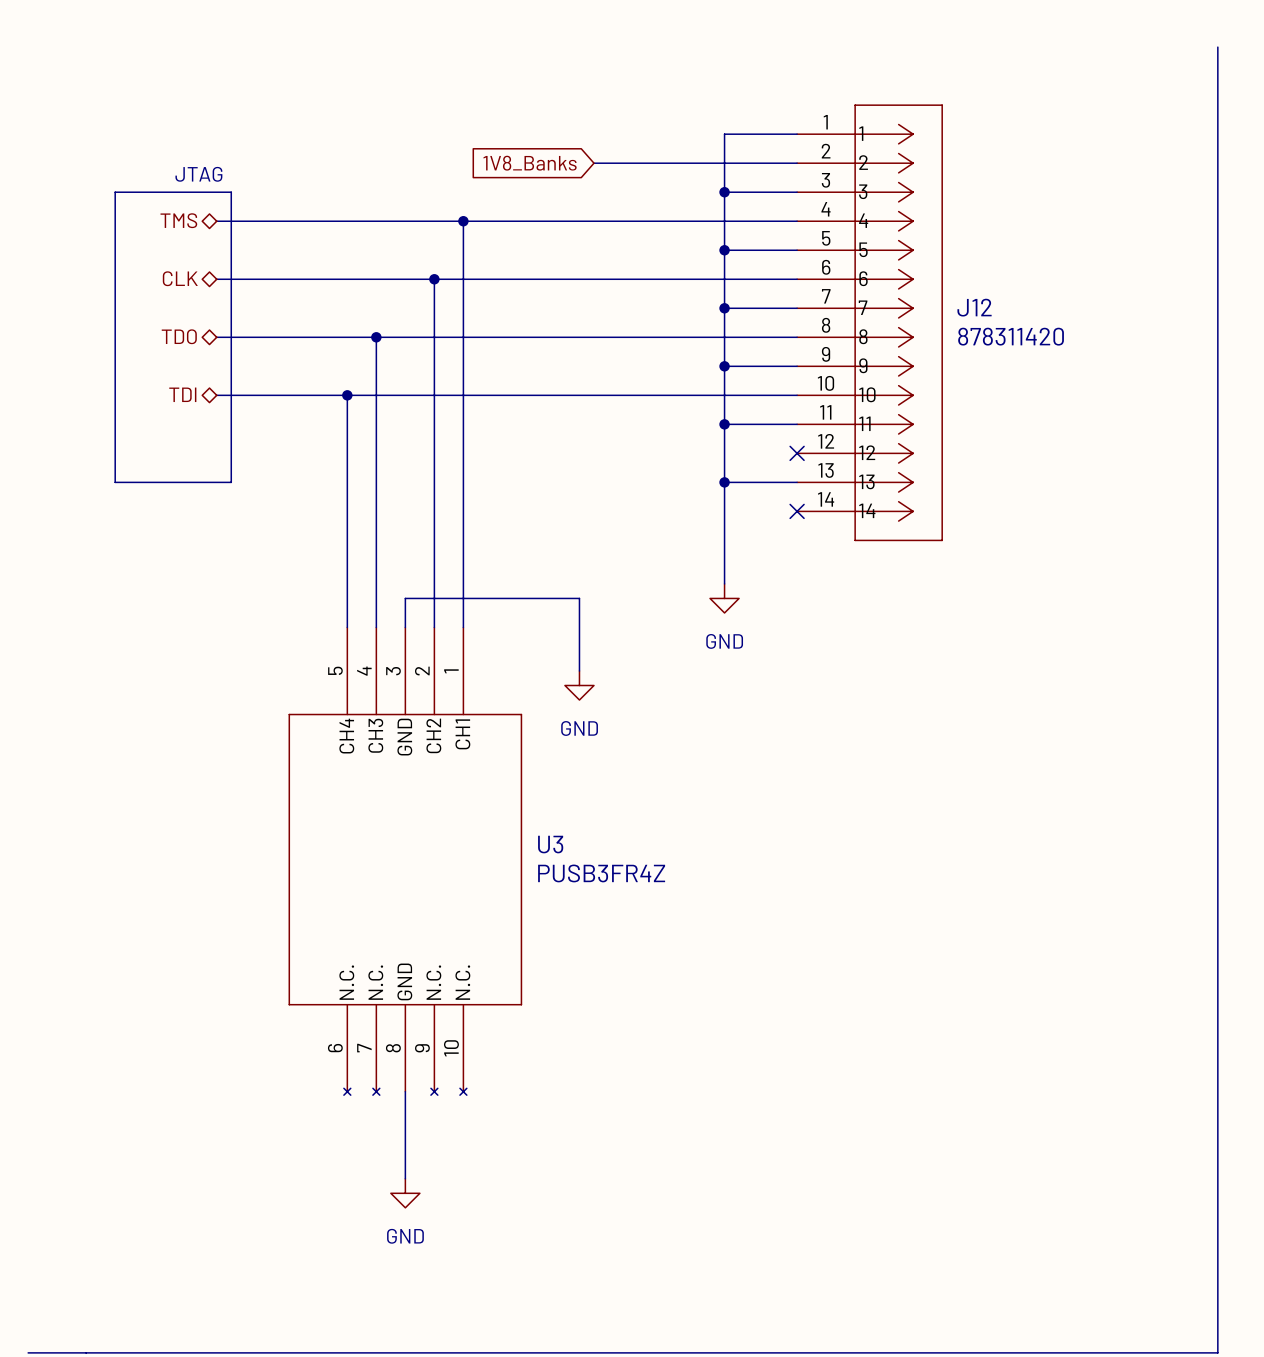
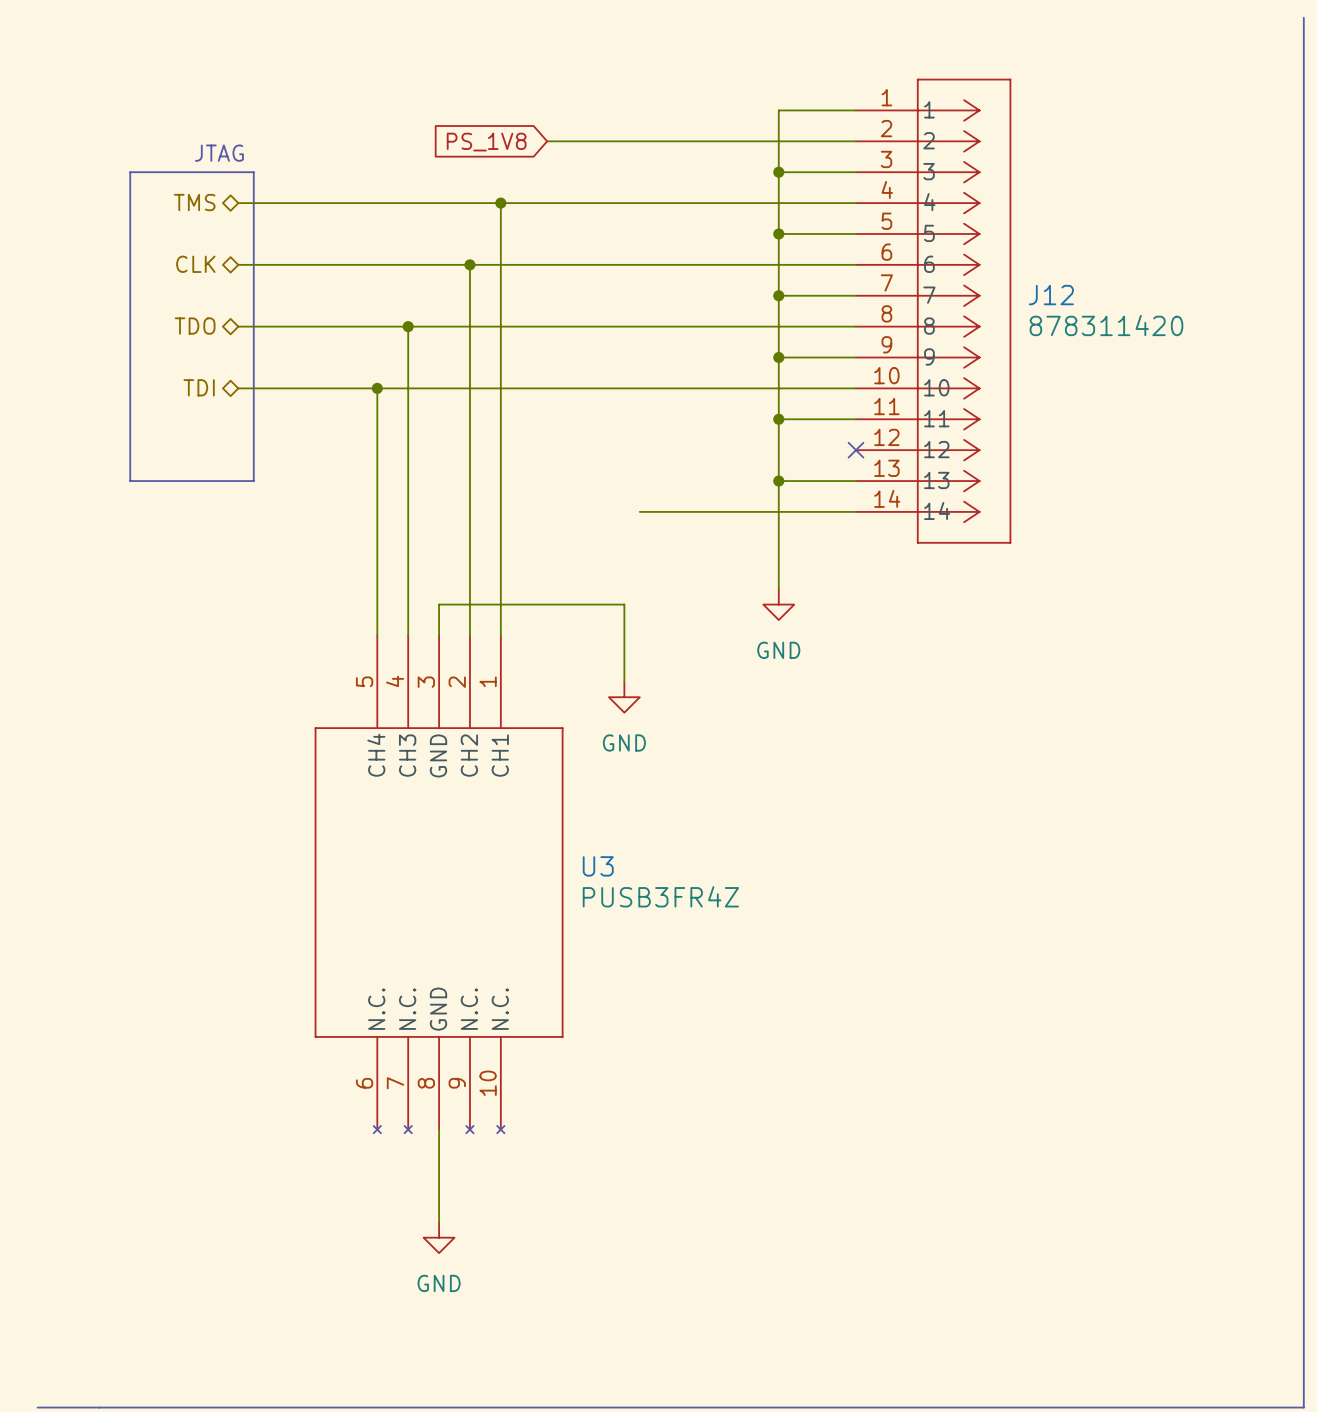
global label: none -> PS_1V8 (486, 142)
wire: none -> (547, 141) (639, 141)
global label: 1V8_Banks (530, 163) -> none
wire: none -> (639, 511) (856, 511)
no-connect mark: (797, 511) -> none

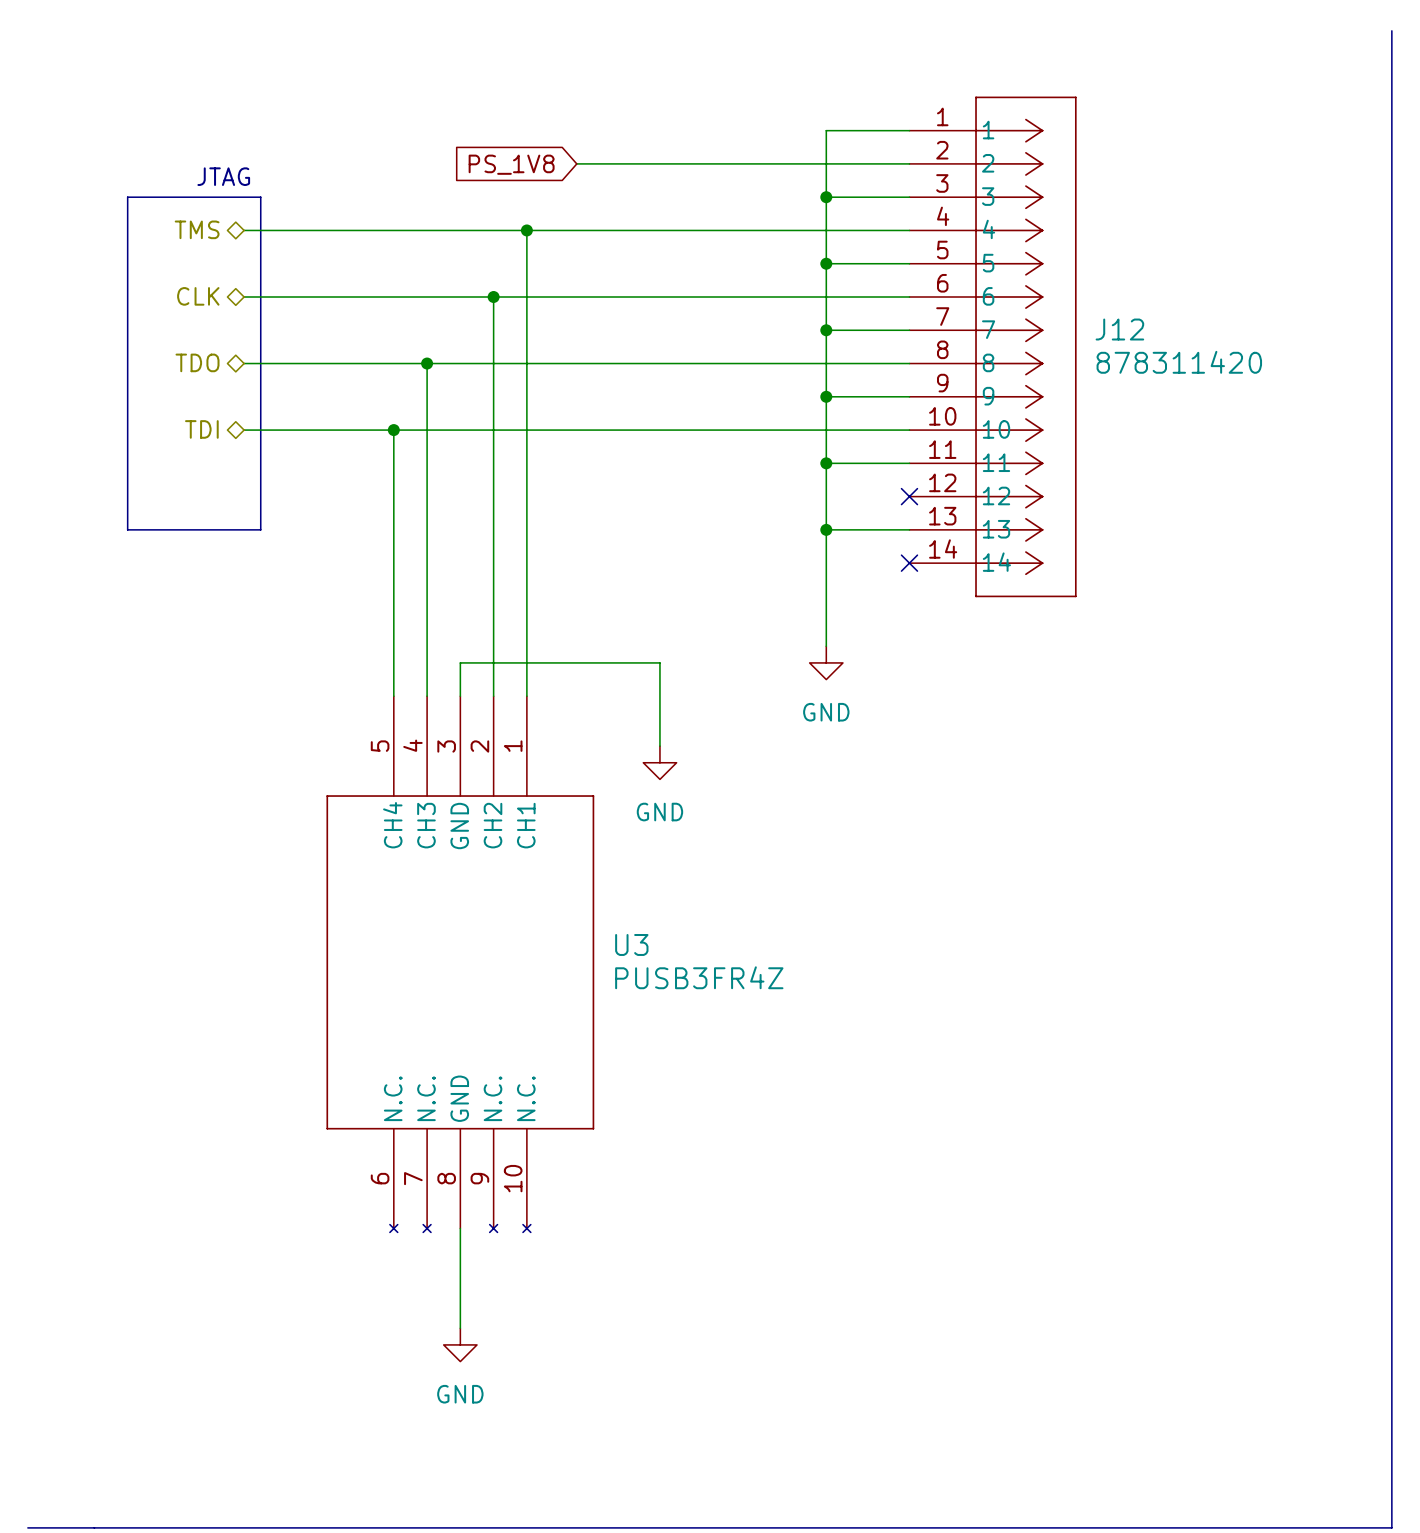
wire: (639, 511) (856, 511) -> none
no-connect mark: none -> (909, 563)

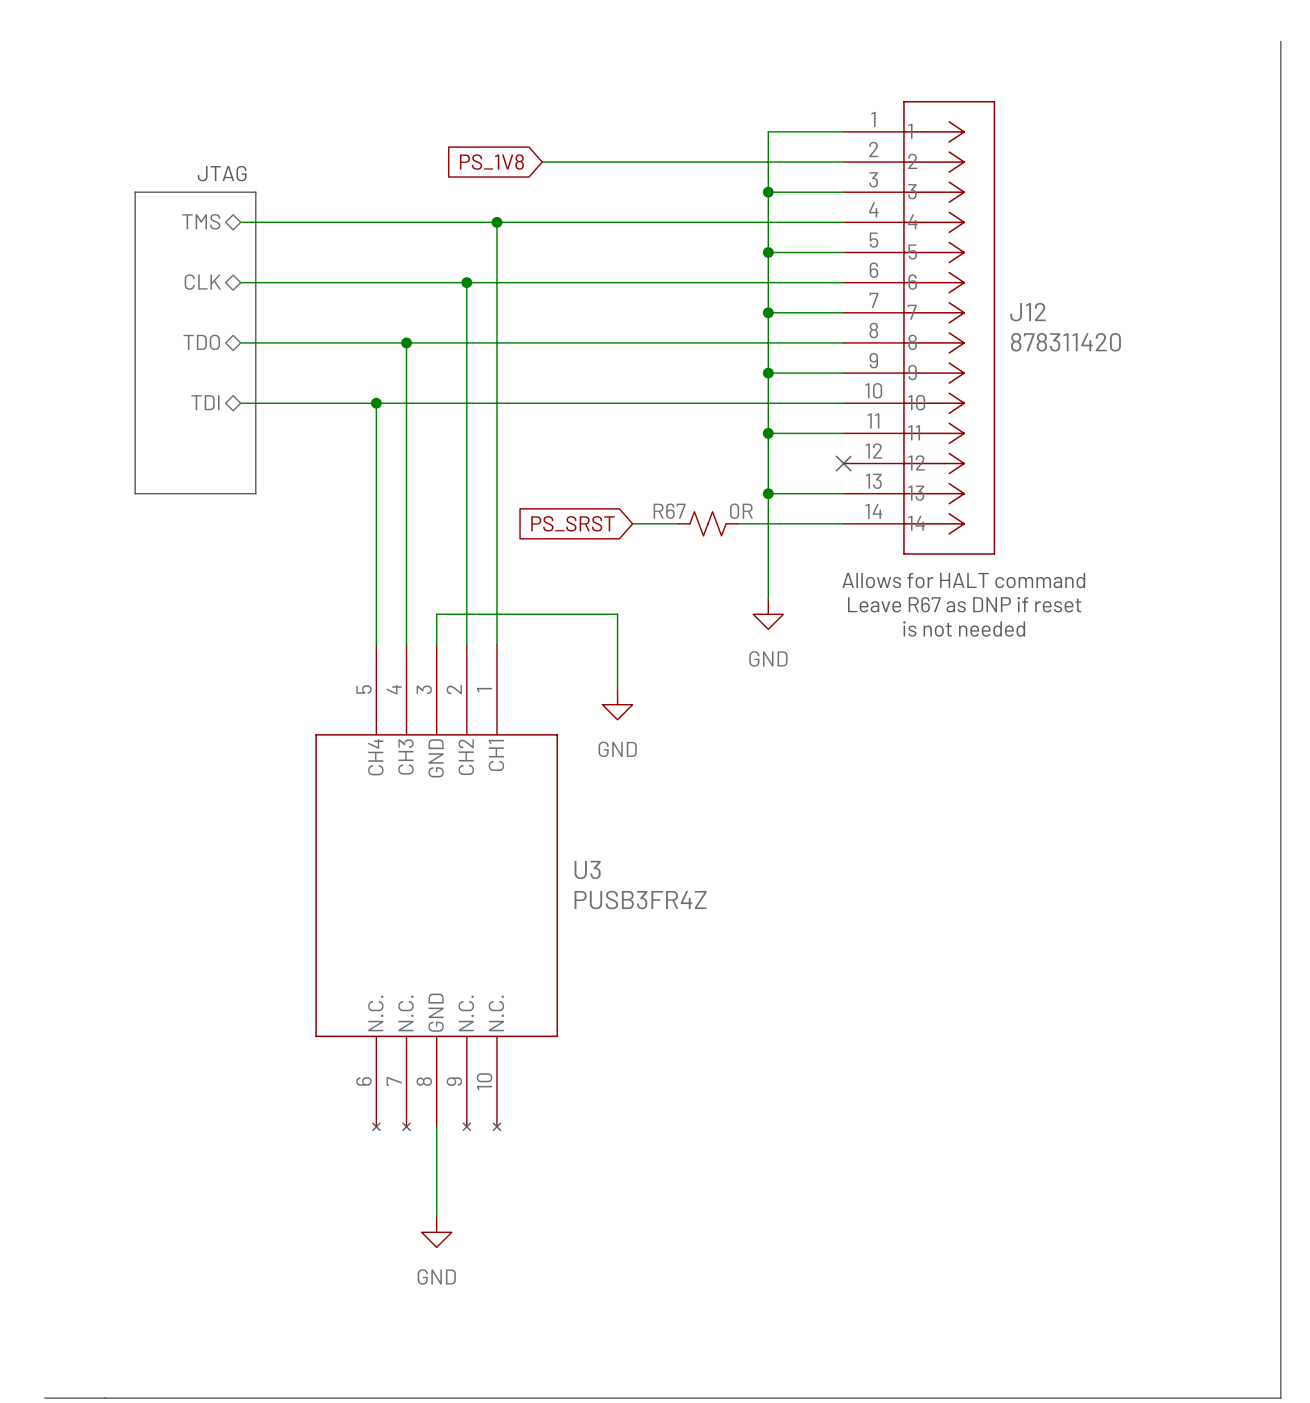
global label: none -> PS_SRST (572, 523)
wire: none -> (632, 523) (677, 523)
R67: none -> 0R (708, 523)
wire: none -> (738, 523) (843, 523)
no-connect mark: (909, 563) -> none
text: none -> Allows for HALT command (963, 580)
text: none -> Leave R67 as DNP if reset (964, 604)
text: none -> is not needed (964, 628)

